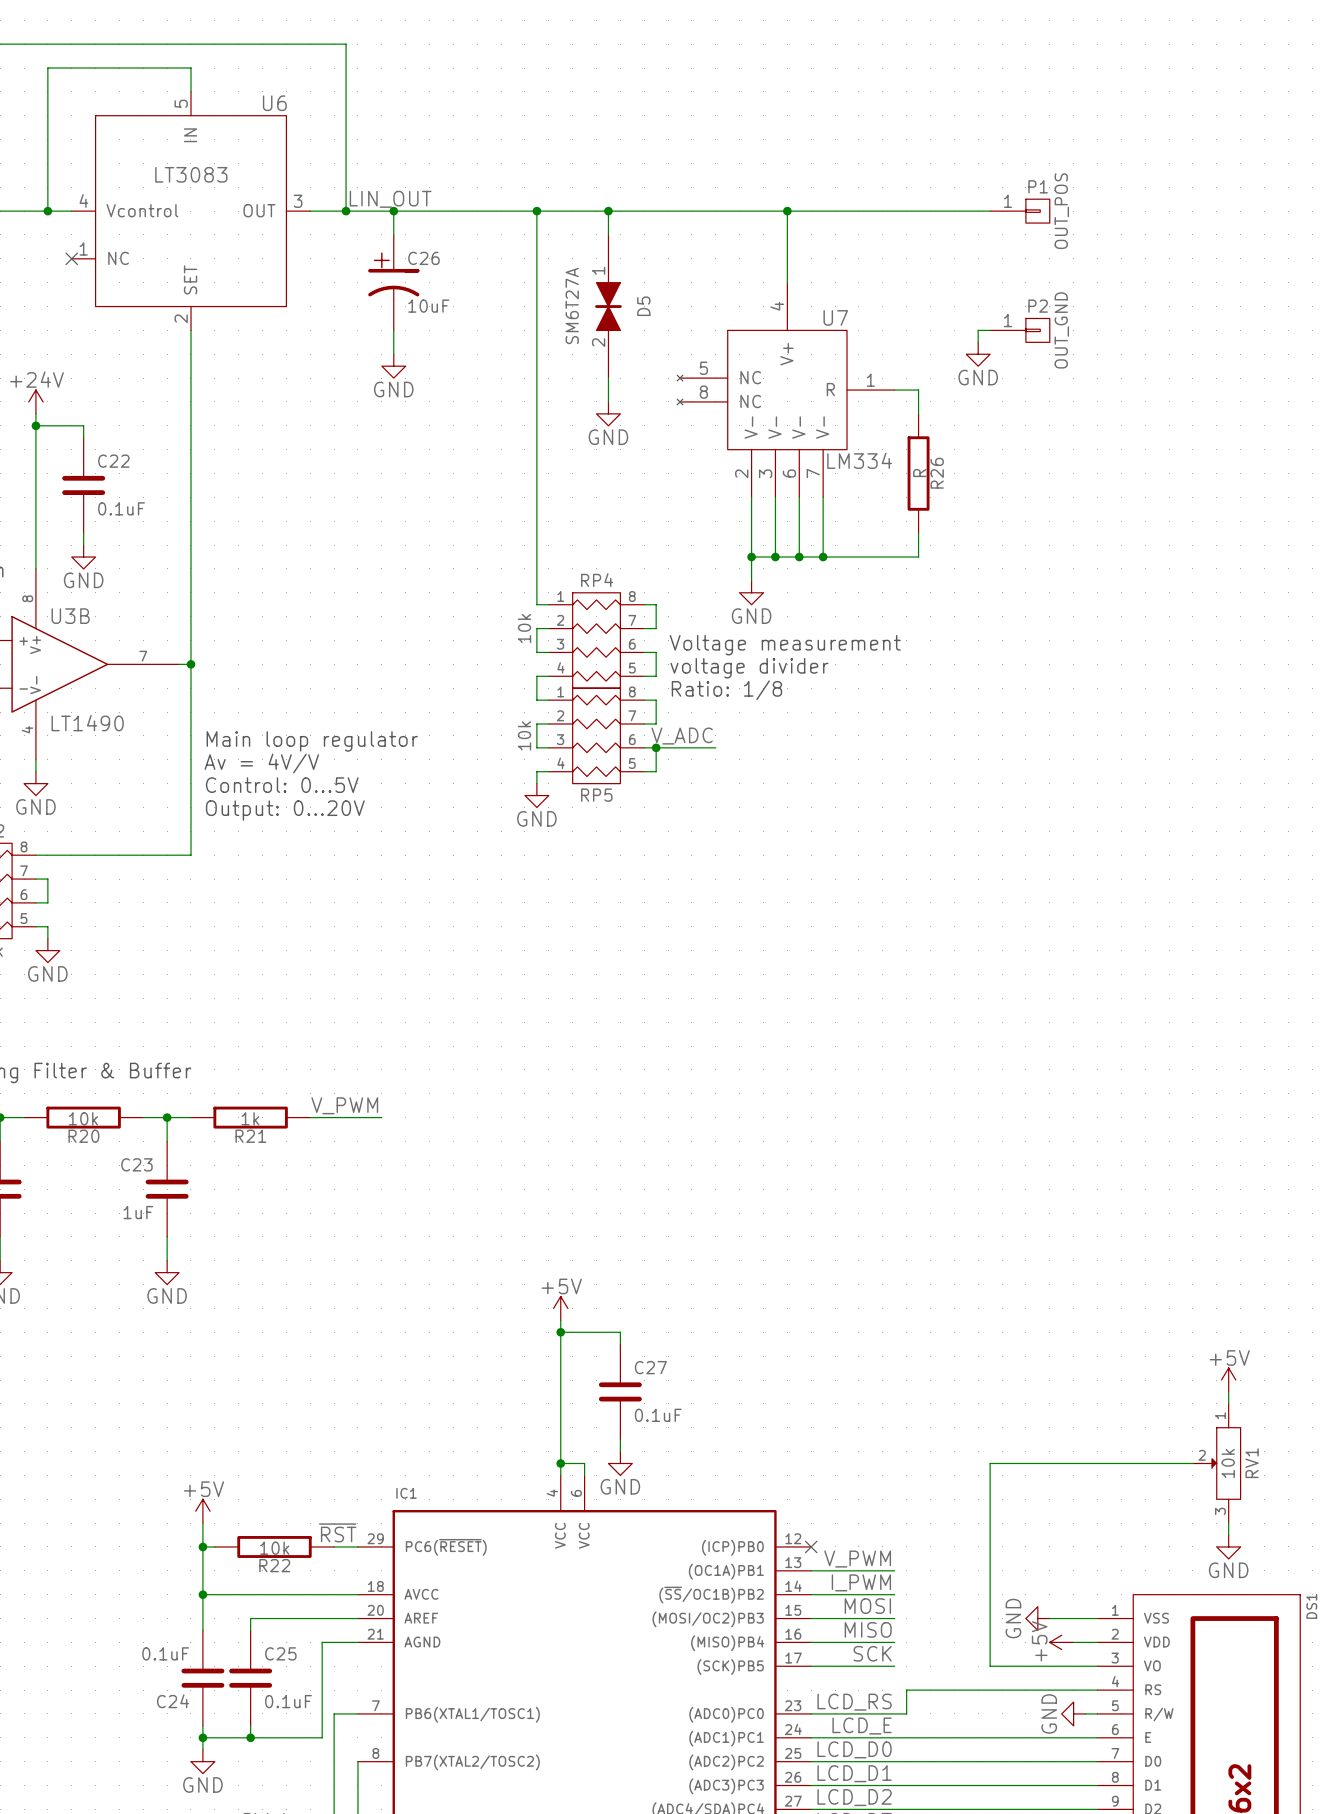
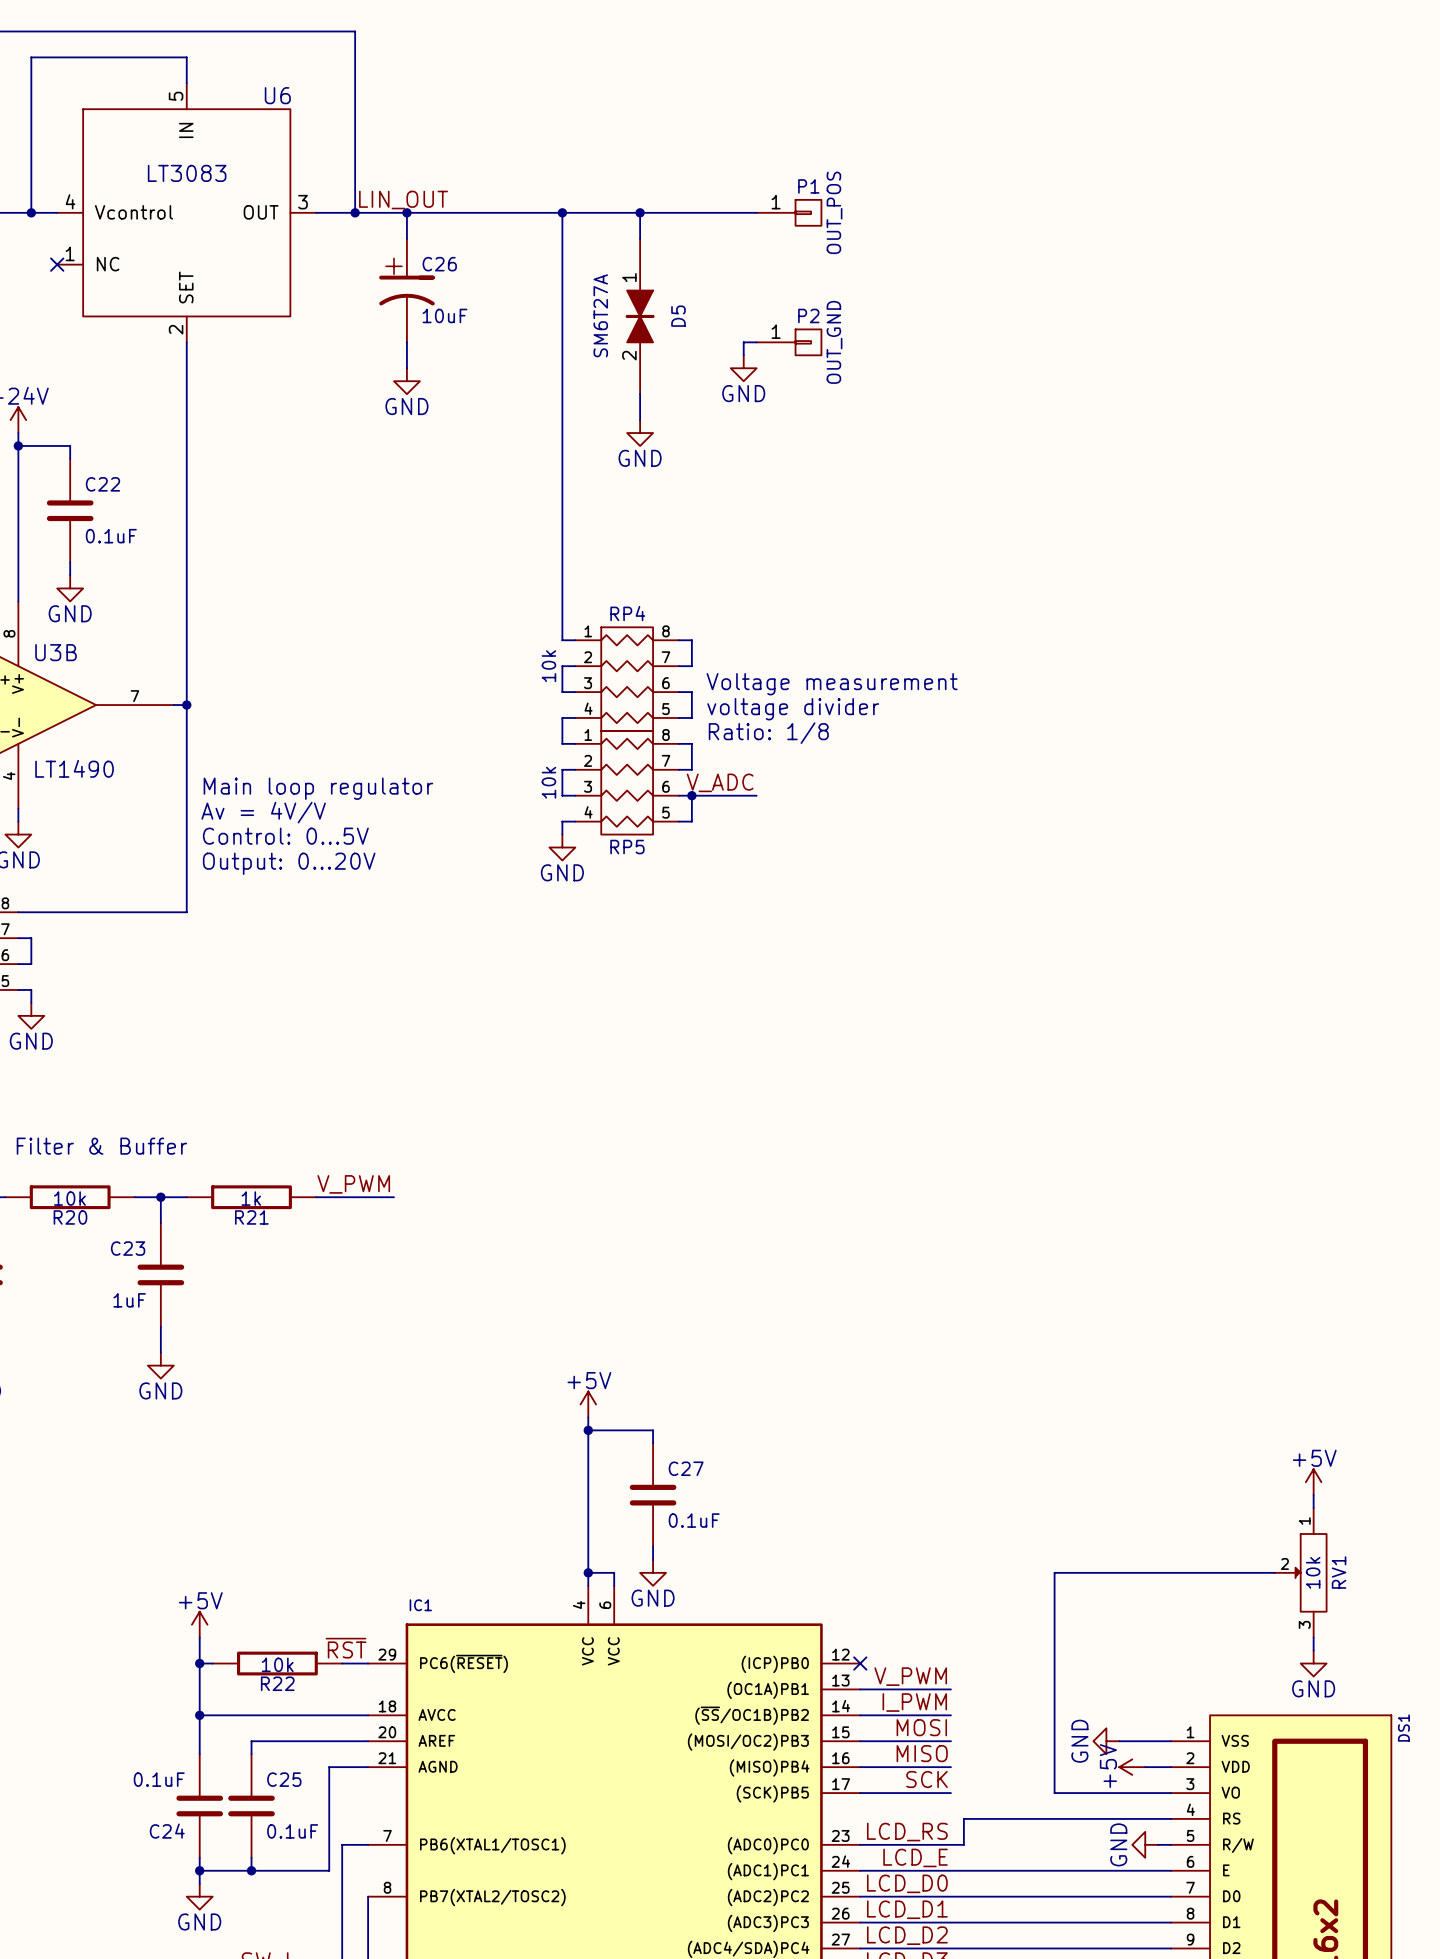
wire: (715, 211) (990, 211) -> none
wire: (787, 211) (787, 282) -> none
junction: (787, 211) -> none
P1 position: (1019, 211) -> (789, 212)
wire: none -> (756, 342) (743, 342) (743, 355)
wire: (990, 330) (978, 330) (978, 342) -> none
P2 position: (1019, 330) -> (789, 342)
power symbol: none -> GND (743, 368)
power symbol: GND (978, 354) -> none
U7: LM334 (785, 390) -> none
wire: (894, 390) (918, 390) (918, 413) -> none
R26: R (918, 473) -> none
wire: (751, 497) (751, 580) -> none
wire: (775, 497) (775, 557) -> none
wire: (799, 497) (799, 557) -> none
wire: (823, 497) (823, 557) -> none
wire: (918, 533) (918, 557) (751, 557) -> none
junction: (751, 557) -> none
junction: (775, 557) -> none
junction: (799, 557) -> none
junction: (823, 557) -> none
power symbol: GND (751, 592) -> none

